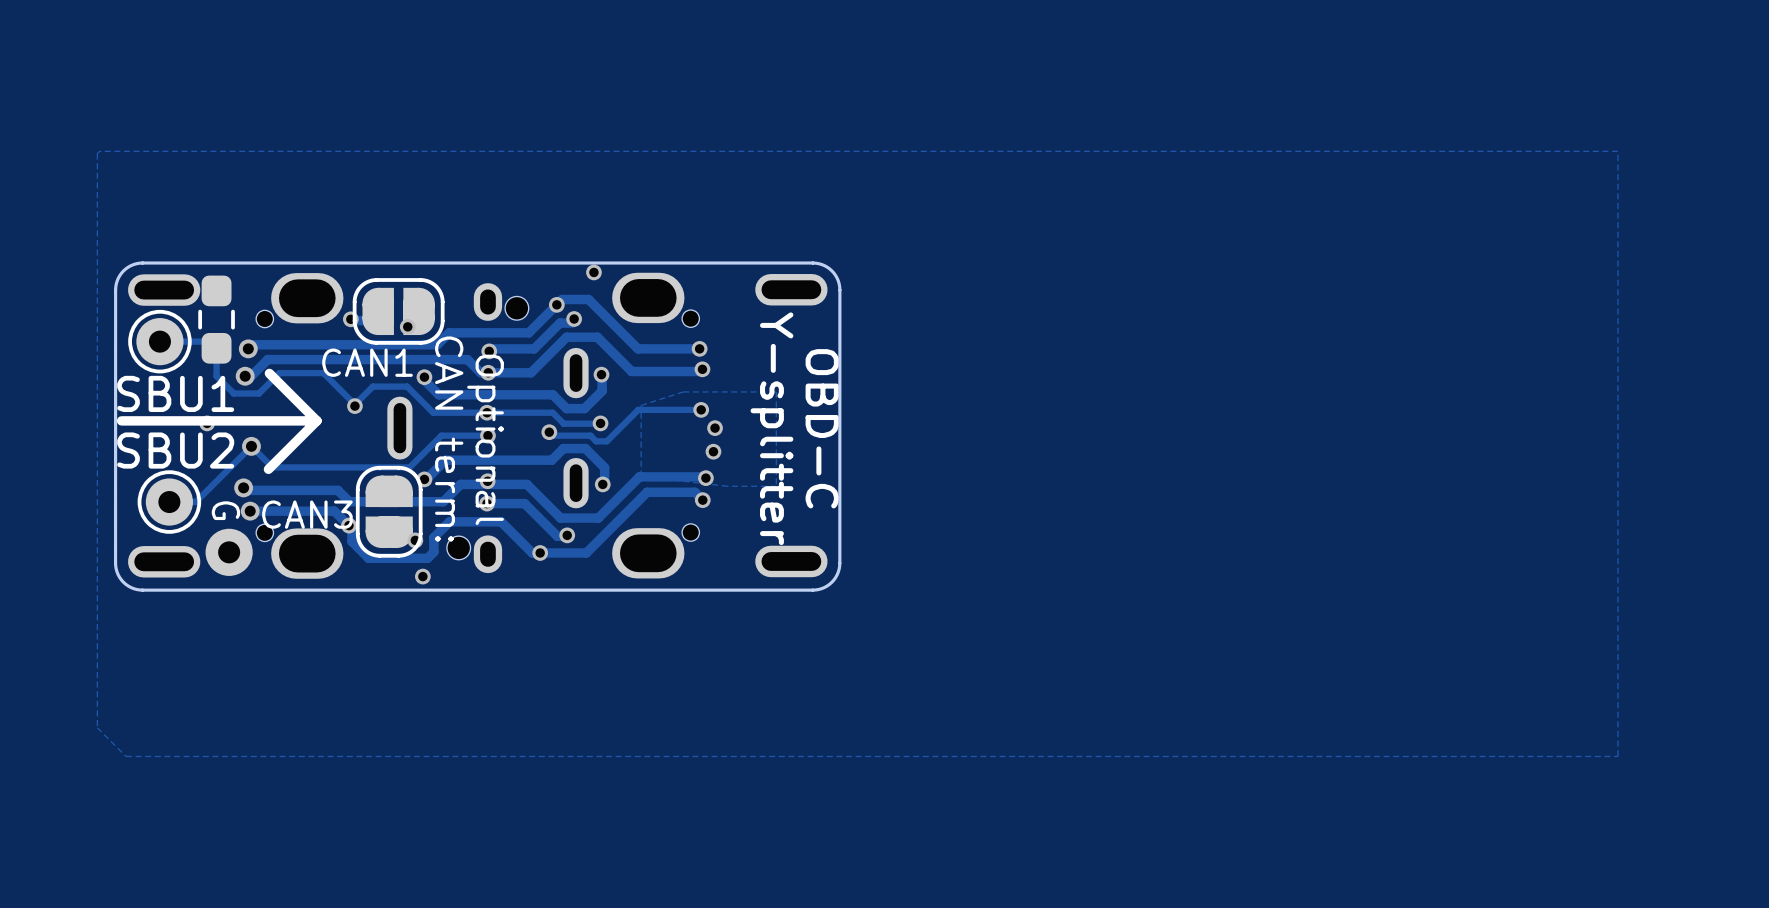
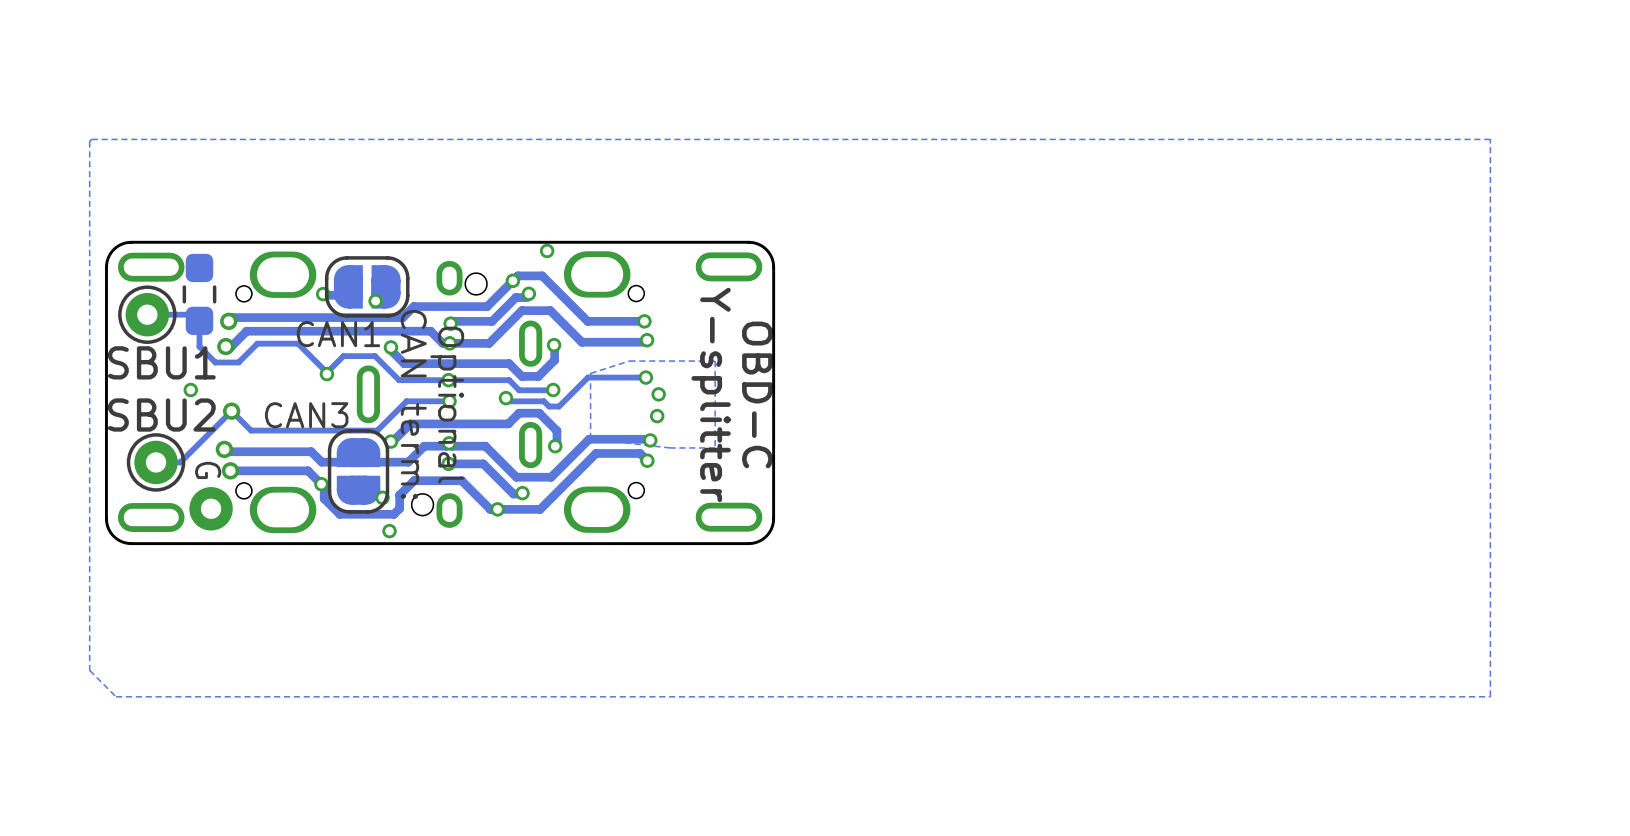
line: (269, 373) (316, 420) -> none
line: (316, 420) (268, 469) -> none
line: (316, 420) (121, 420) -> none
CAN3 name position: CAN3 (307, 514) -> CAN3 (306, 415)

